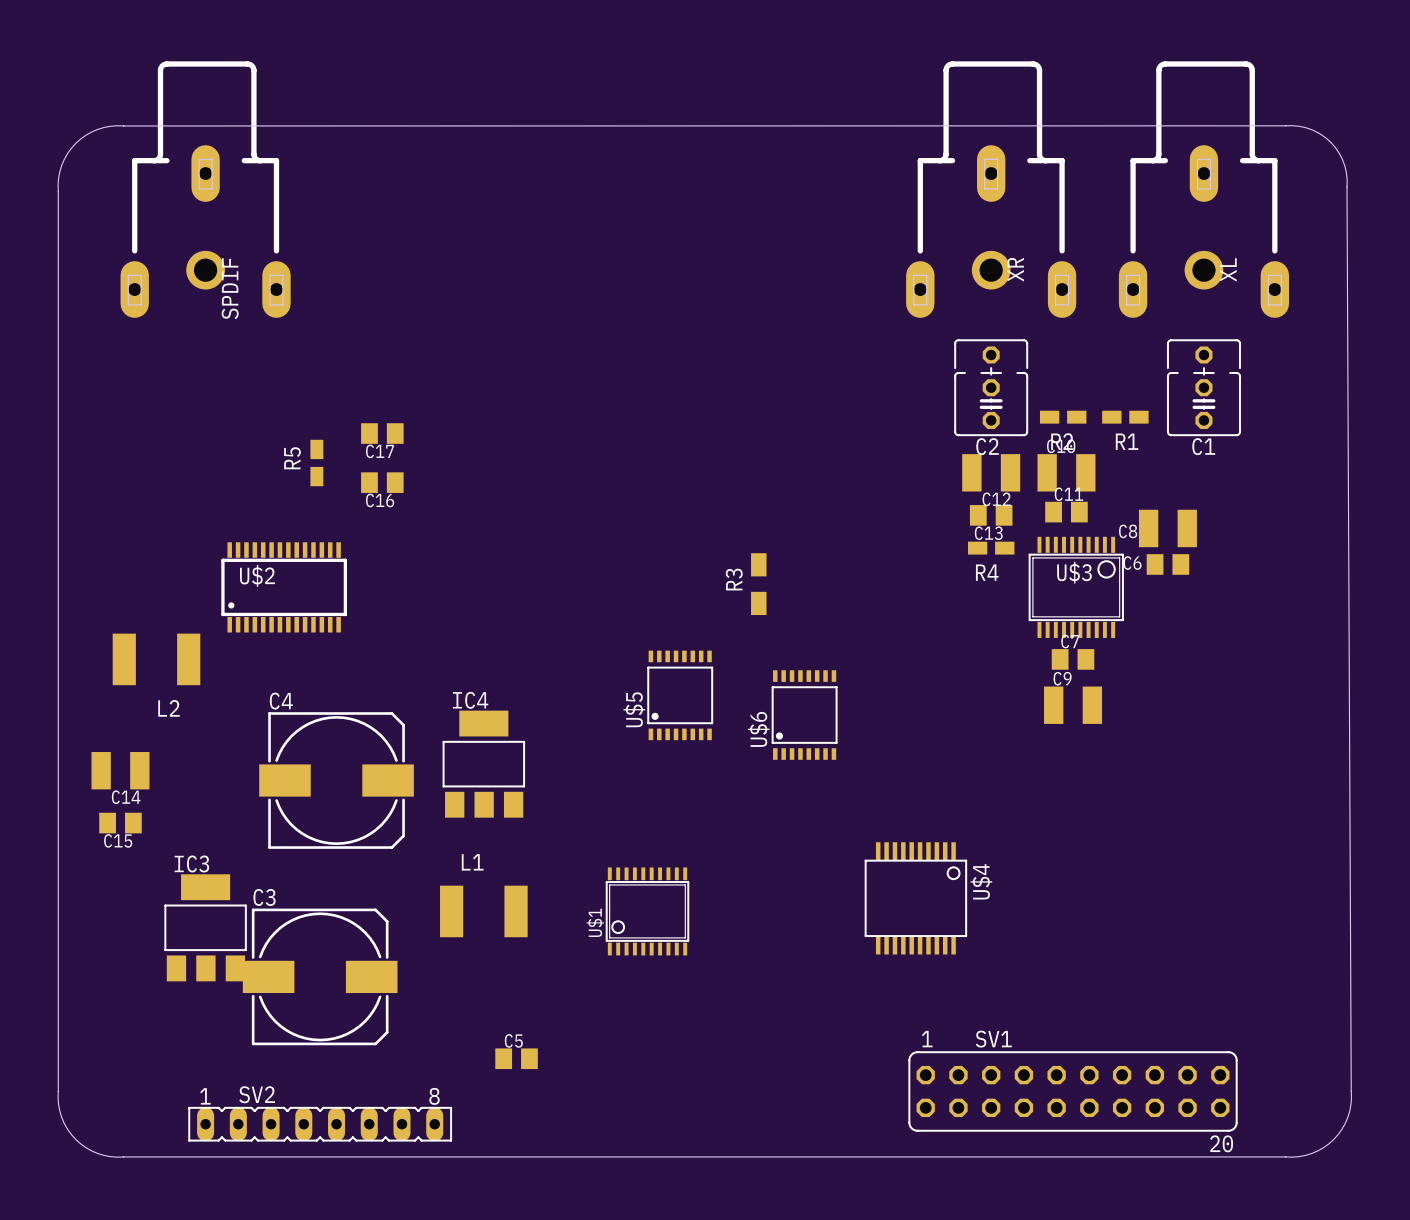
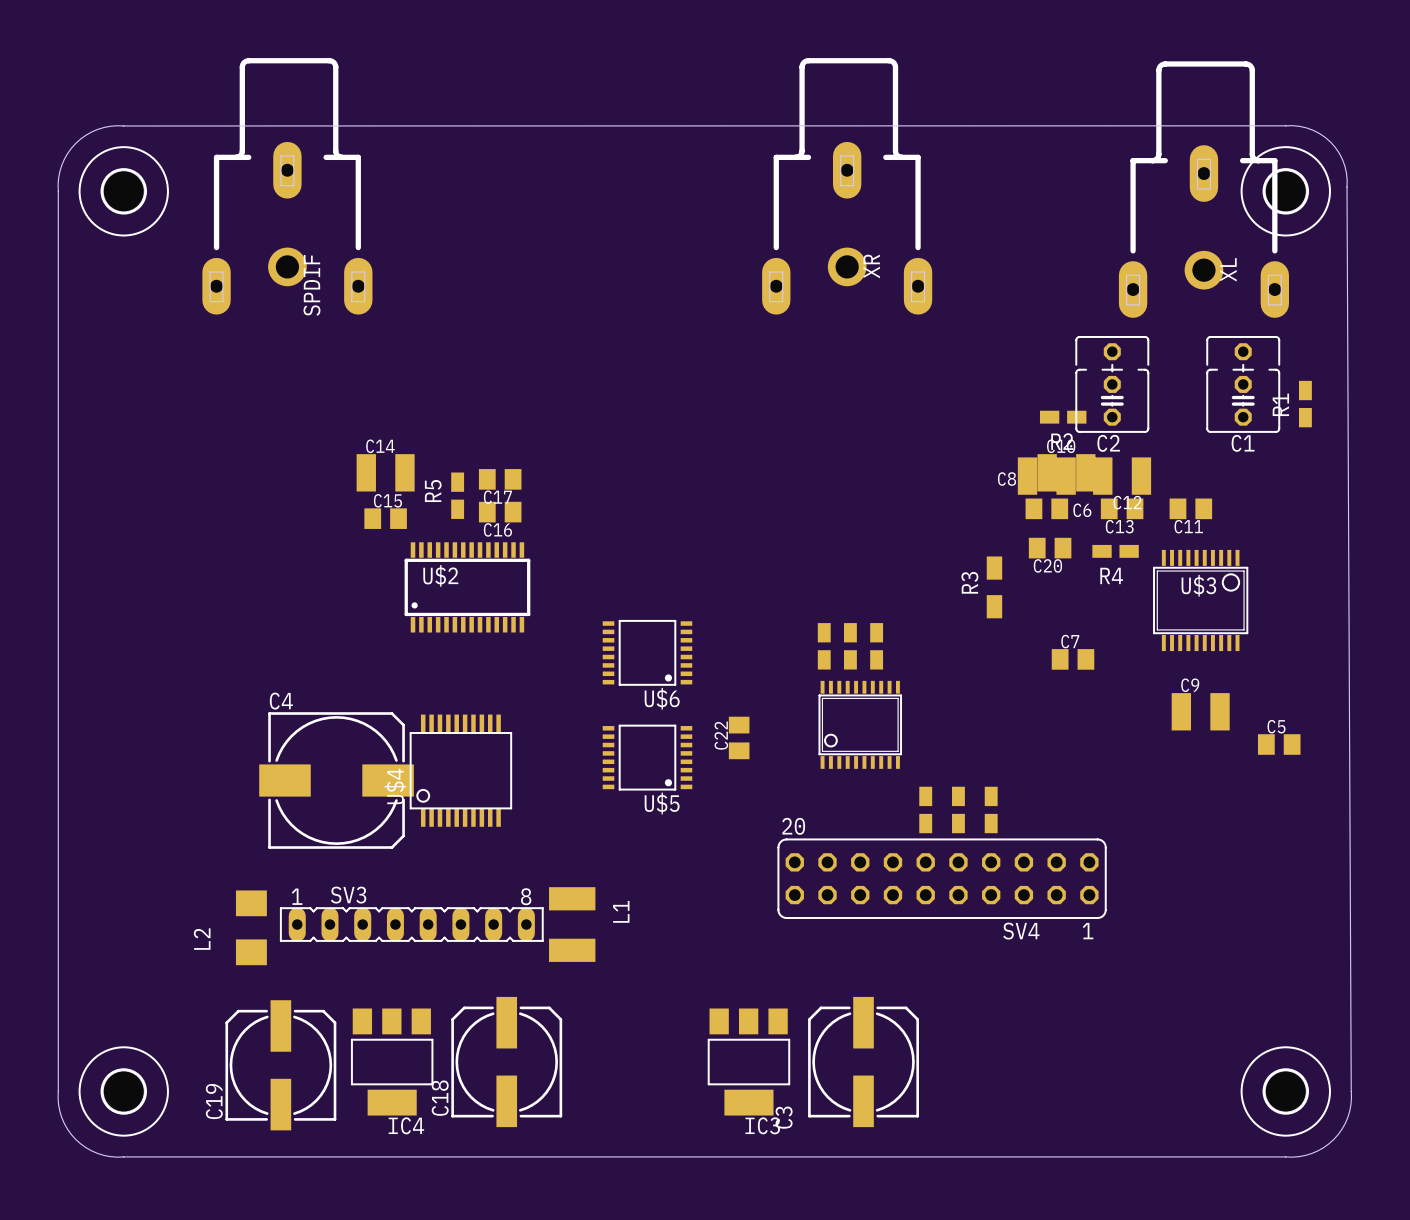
SPDIF position: (205, 189) -> (287, 186)
XR position: (991, 189) -> (847, 186)
part: none -> (123, 191)
part: none -> (1285, 191)
C2 position: (991, 387) -> (1112, 384)
C1 position: (1203, 387) -> (1243, 384)
R1 rotation: 0° (1125, 417) -> 90° clockwise (1305, 404)
R1 position: (1125, 417) -> (1305, 404)
C17 position: (382, 433) -> (500, 479)
R5 position: (316, 463) -> (457, 495)
C12 position: (991, 472) -> (1122, 476)
C16 position: (382, 482) -> (500, 512)
C11 name position: C11 (1068, 494) -> C11 (1188, 526)
C11 position: (1066, 512) -> (1190, 508)
C13 position: (991, 515) -> (1122, 508)
C8 position: (1167, 528) -> (1046, 476)
R4 position: (991, 548) -> (1115, 551)
C20: none -> (1050, 548)
C6 name position: C6 (1132, 563) -> C6 (1082, 510)
C6 position: (1167, 564) -> (1046, 508)
R3 position: (758, 584) -> (994, 587)
U$2 position: (284, 587) -> (467, 587)
U$3 position: (1076, 587) -> (1200, 600)
L2 footprint: [112, 633, 201, 686] -> [235, 890, 267, 966]
part: none -> (824, 646)
part: none -> (850, 646)
part: none -> (876, 646)
U$5 rotation: 0° (680, 695) -> 90° counterclockwise (647, 757)
U$5 position: (680, 695) -> (647, 757)
C9 position: (1073, 705) -> (1200, 711)
L2 name position: L2 (168, 708) -> L2 (202, 939)
U$6 rotation: 0° (804, 715) -> 90° counterclockwise (647, 652)
U$6 position: (804, 715) -> (647, 652)
part: none -> (860, 724)
C22: none -> (739, 737)
IC4 rotation: 0° (483, 764) -> 180° (392, 1062)
IC4 position: (483, 764) -> (392, 1062)
C14 position: (120, 770) -> (385, 472)
C14 name position: C14 (126, 797) -> C14 (380, 446)
part: none -> (925, 809)
part: none -> (958, 809)
part: none -> (991, 809)
C15 position: (120, 823) -> (385, 518)
C15 name position: C15 (118, 840) -> C15 (387, 500)
L1 name position: L1 (472, 862) -> L1 (621, 911)
SV4: none -> (942, 878)
L1 footprint: [440, 885, 528, 938] -> [549, 887, 596, 962]
C3 name position: C3 (264, 897) -> C3 (784, 1117)
U$4 rotation: 0° (915, 898) -> 180° (460, 770)
U$4 position: (915, 898) -> (460, 770)
C3 footprint: [242, 908, 398, 1046] -> [808, 996, 919, 1128]
U$1: (647, 911) -> none
SV3: none -> (411, 924)
IC3 rotation: 0° (205, 927) -> 180° (748, 1062)
IC3 position: (205, 927) -> (748, 1062)
C5 position: (516, 1058) -> (1279, 744)
C18: none -> (506, 1062)
C19: none -> (280, 1065)
part: none -> (123, 1091)
SV1: (1073, 1091) -> none
part: none -> (1285, 1091)
SV2: (320, 1124) -> none

